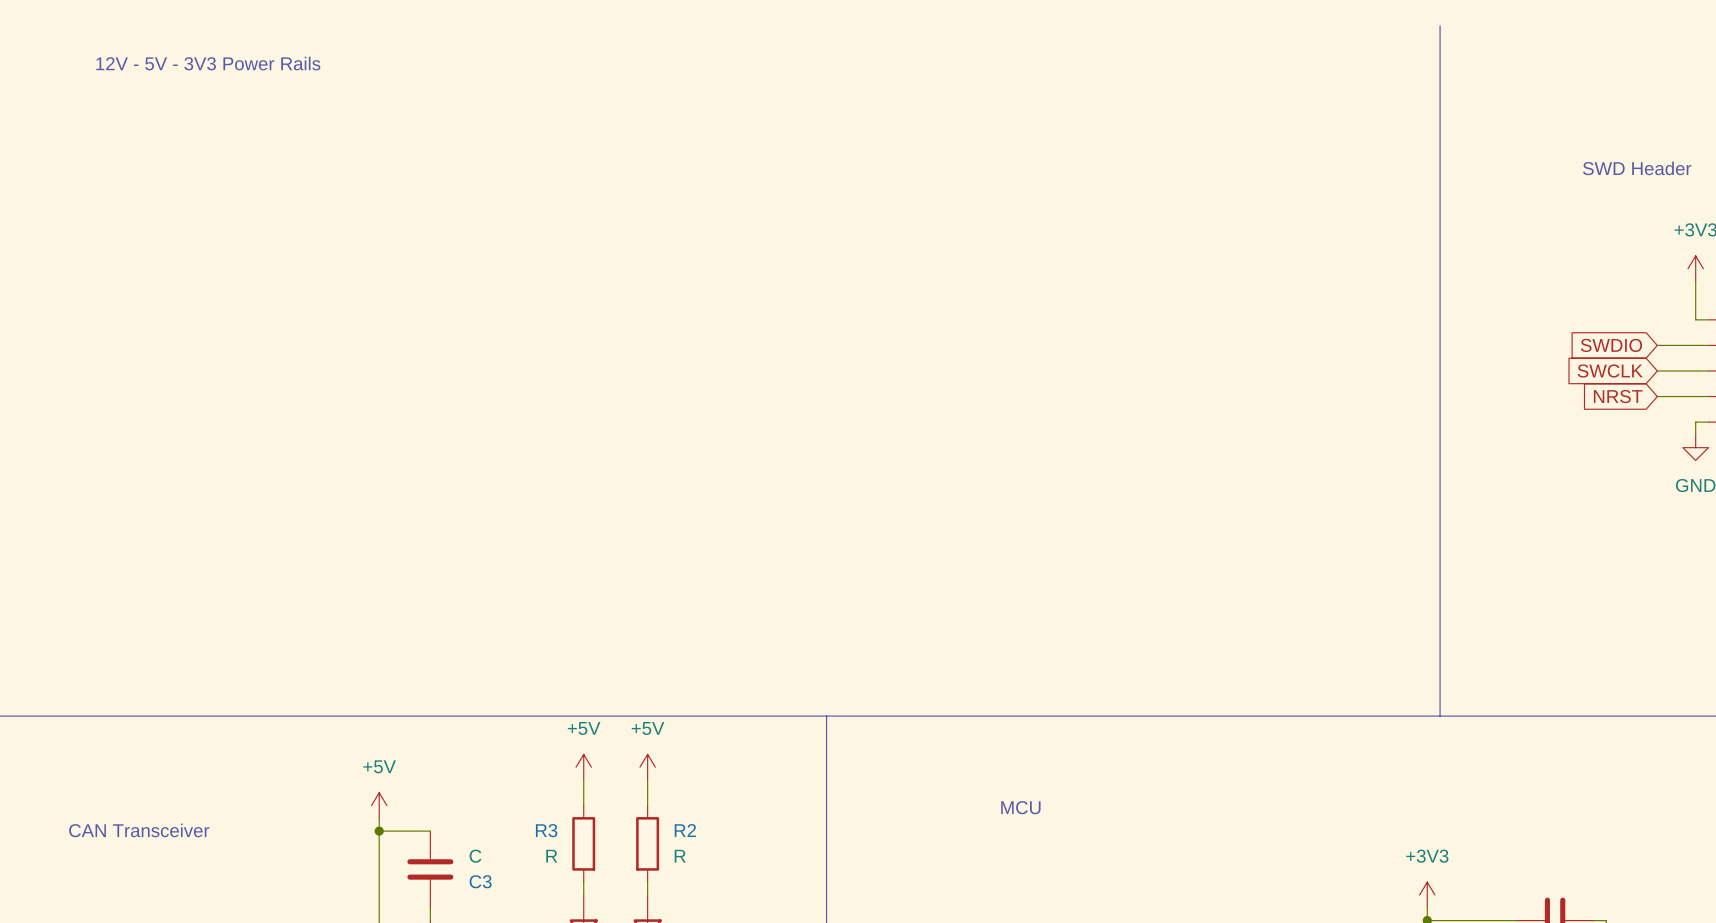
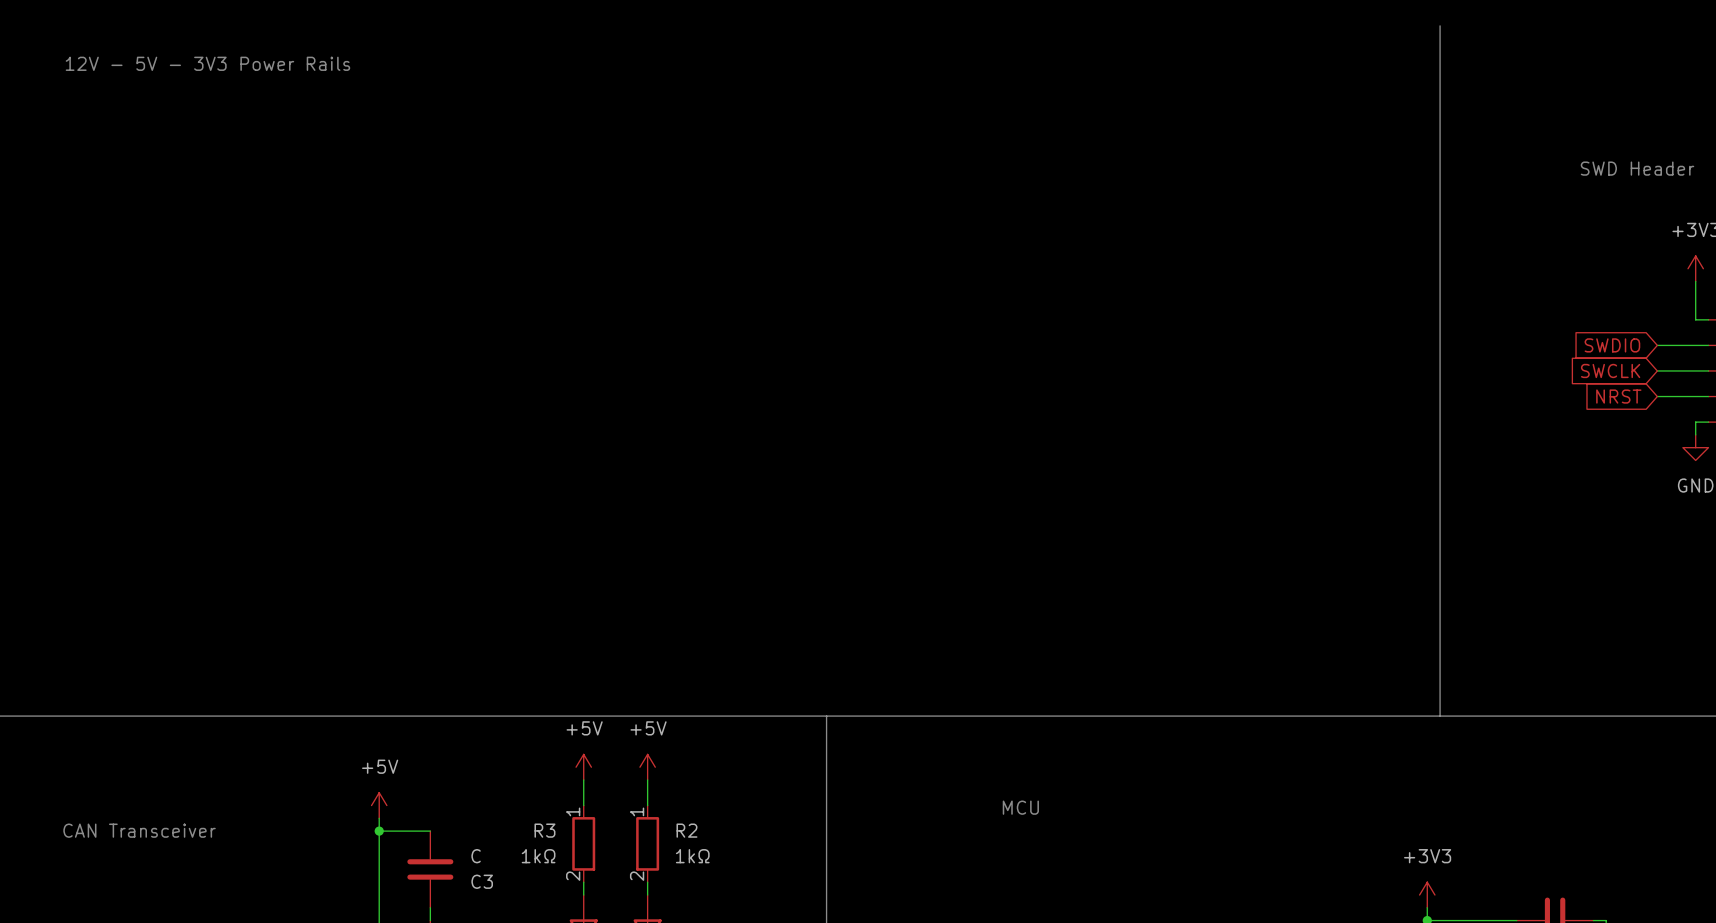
R3 pin number: none -> 1 (573, 811)
R2 pin number: none -> 1 (637, 811)
R3 value: R (551, 856) -> 1kΩ (538, 856)
R2 value: R (680, 856) -> 1kΩ (692, 856)
R3 pin number: none -> 2 (573, 876)
R2 pin number: none -> 2 (637, 876)

